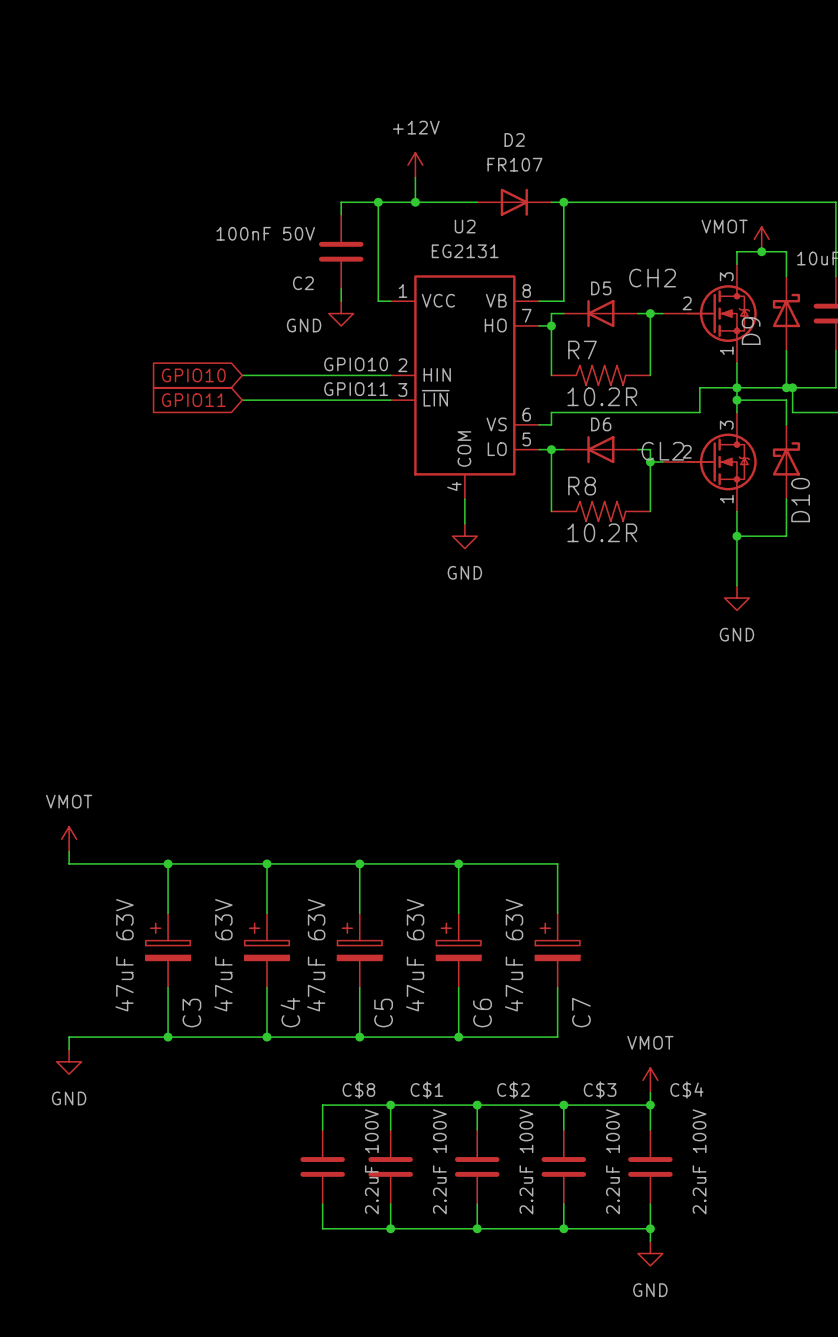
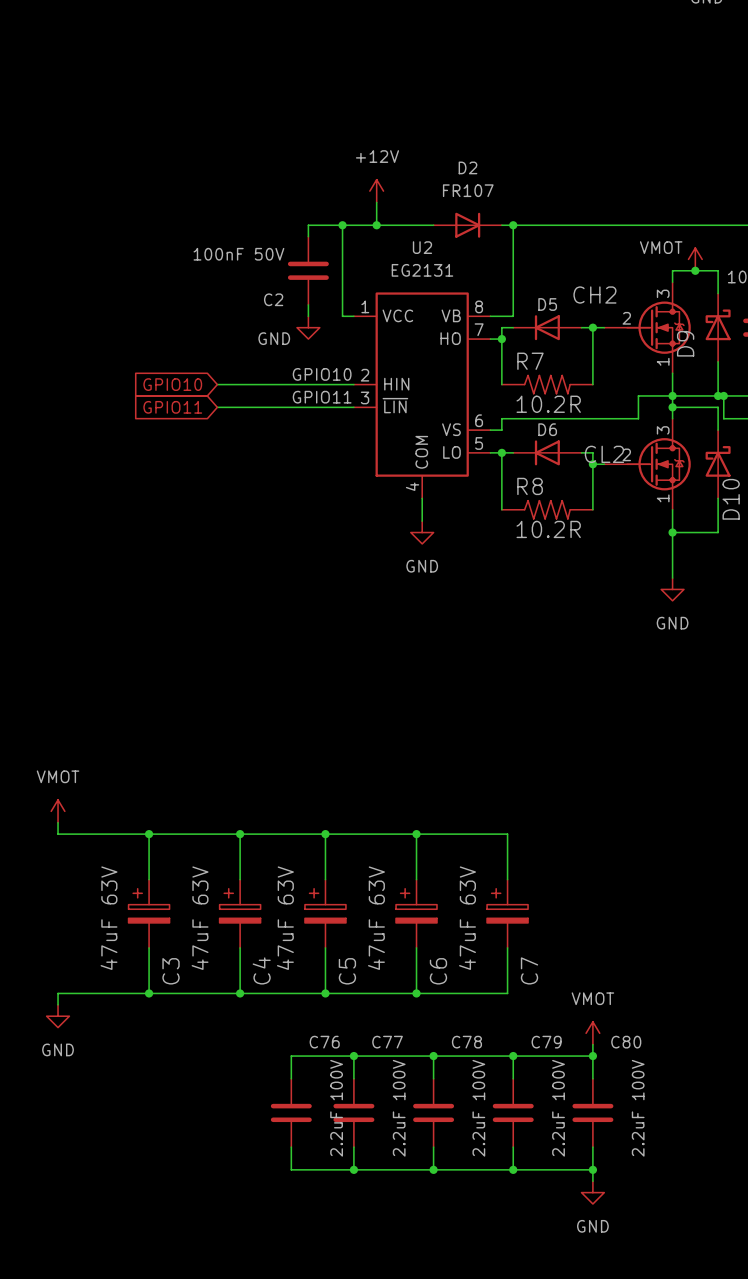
C$8 name: C$8 (358, 1089) -> C76 (324, 1042)
C$1 name: C$1 (426, 1089) -> C77 (387, 1042)
C$2 name: C$2 (513, 1089) -> C78 (466, 1042)
C$3 name: C$3 (600, 1089) -> C79 (546, 1042)
C$4 name: C$4 (686, 1089) -> C80 (626, 1042)

